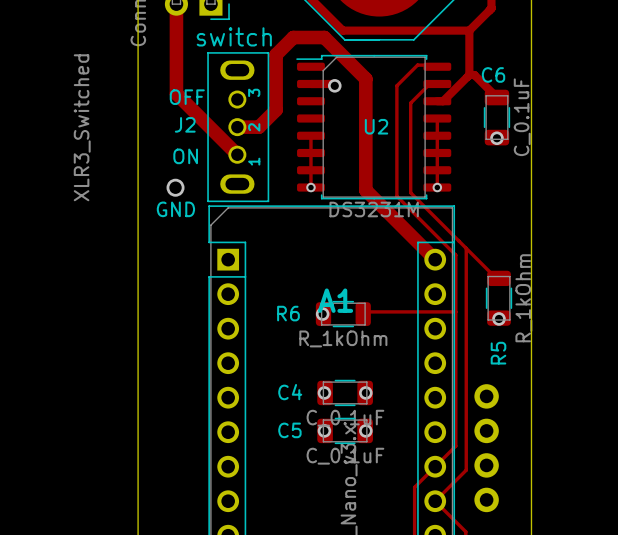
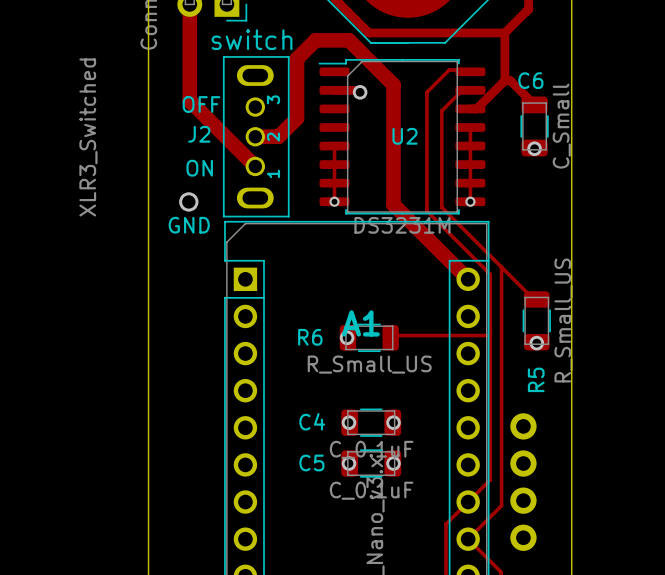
C6 value: C_0.1uF (522, 117) -> C_Small (561, 126)
R5 value: R_1kOhm (523, 298) -> R_Small_US (563, 320)
R6 value: R_1kOhm (343, 338) -> R_Small_US (369, 364)

